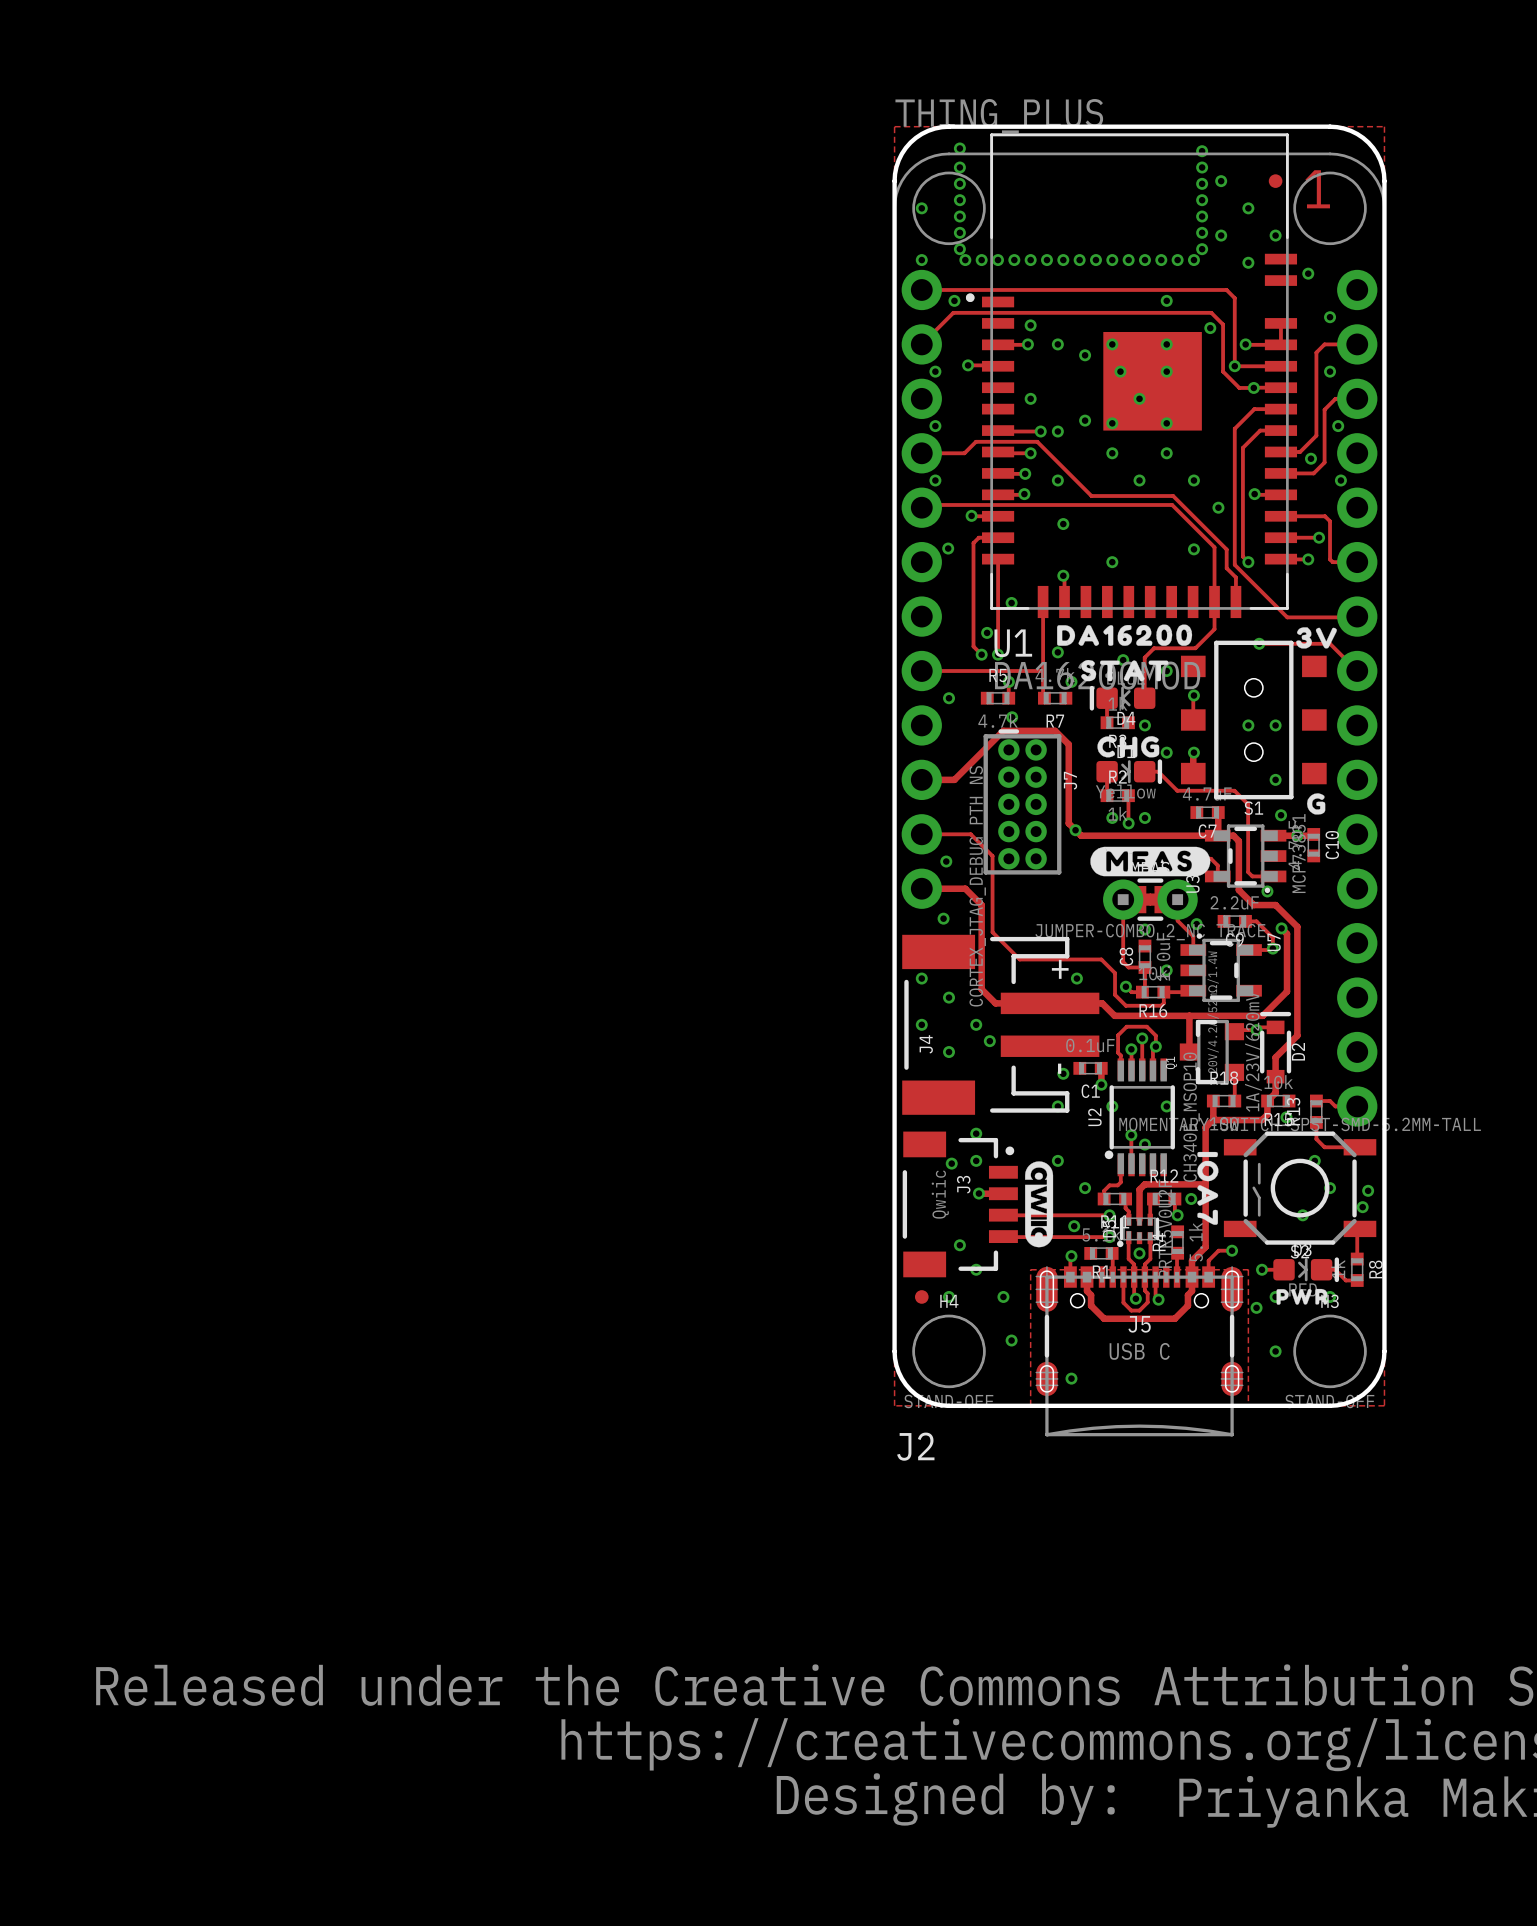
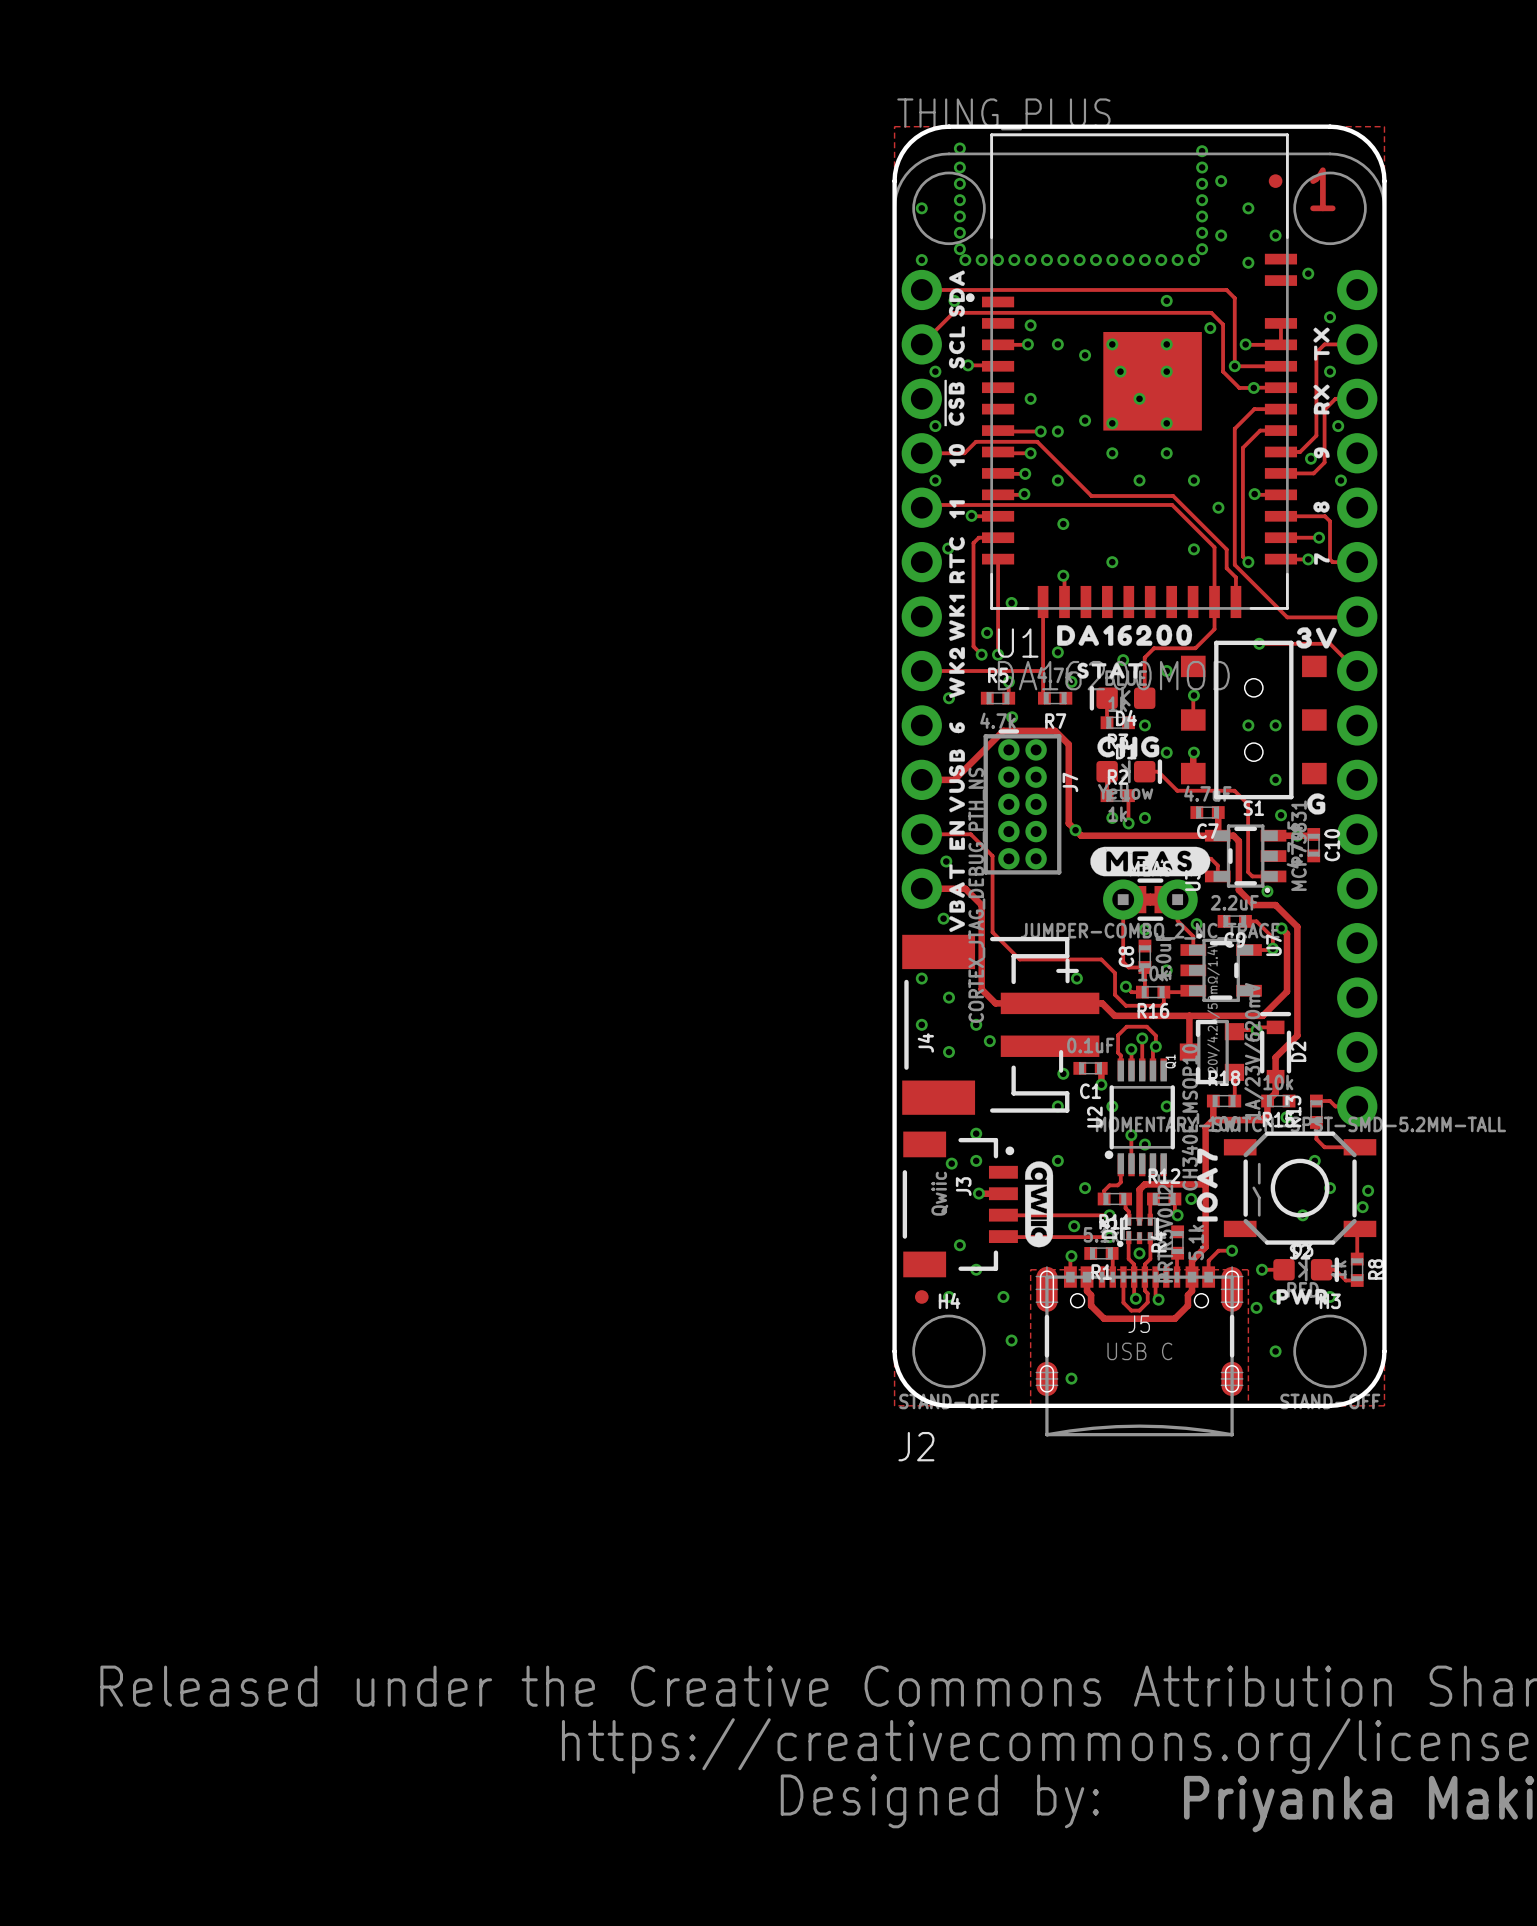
drawing: none -> [944, 270, 965, 467]
drawing: none -> [1313, 327, 1330, 415]
drawing: none -> [1313, 447, 1330, 459]
drawing: none -> [948, 500, 965, 933]
drawing: none -> [1313, 501, 1330, 513]
drawing: none -> [1314, 553, 1330, 565]
drawing shape: [1081, 659, 1169, 682] -> [1077, 662, 1143, 679]
drawing shape: [1197, 1151, 1219, 1225] -> [1196, 1148, 1218, 1222]

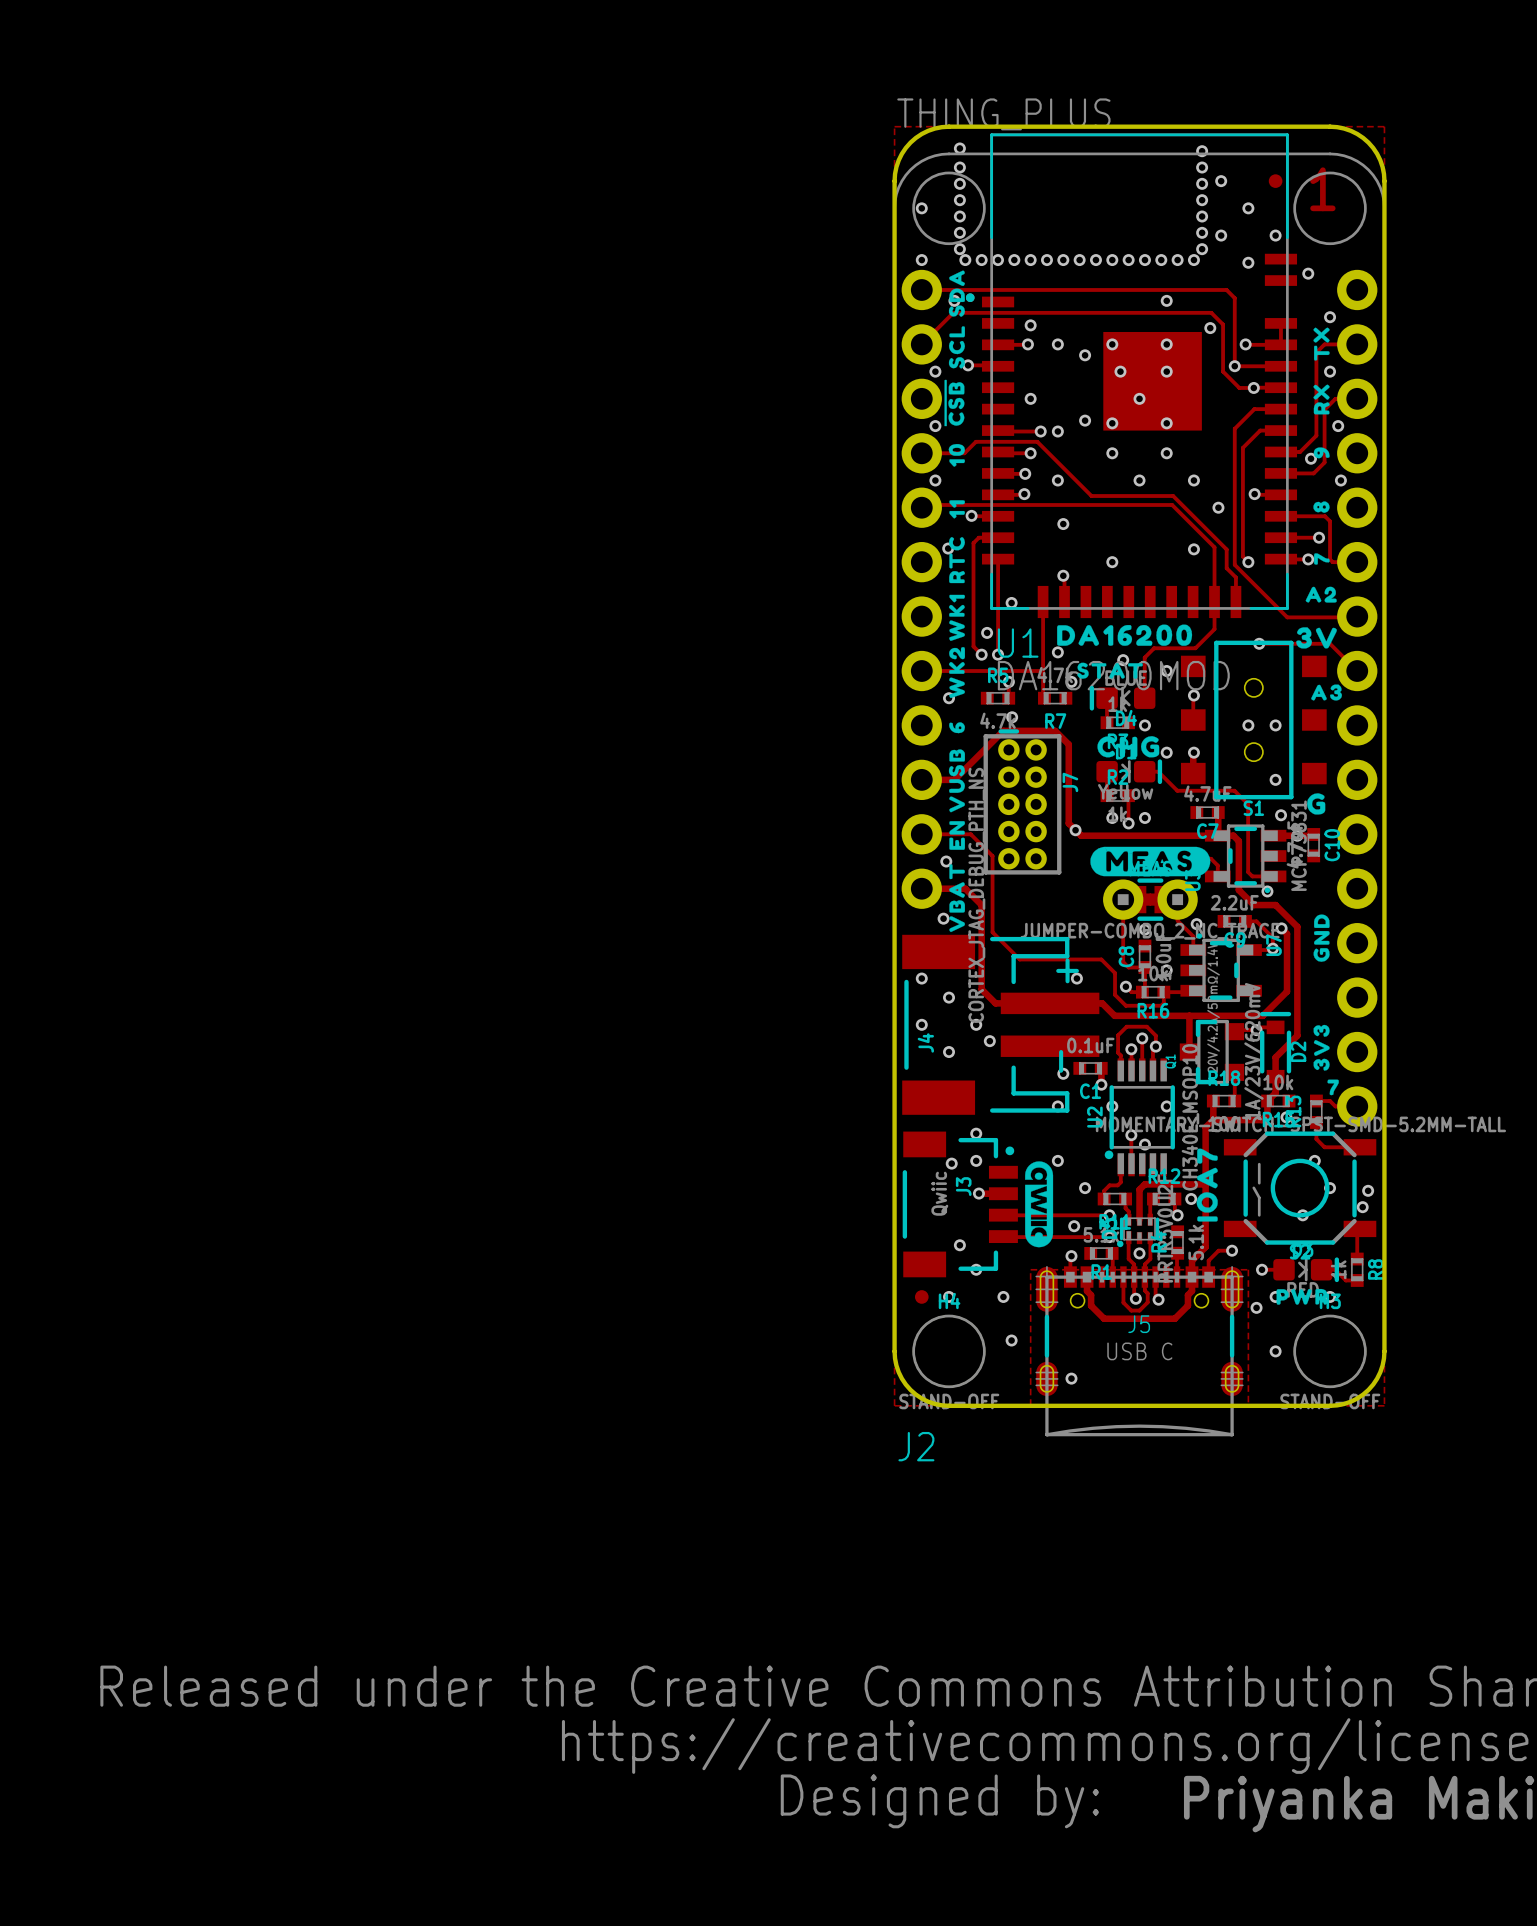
drawing: none -> [1305, 586, 1337, 603]
drawing: none -> [1311, 684, 1342, 701]
drawing: none -> [1313, 914, 1330, 962]
drawing: none -> [1313, 1024, 1339, 1096]

